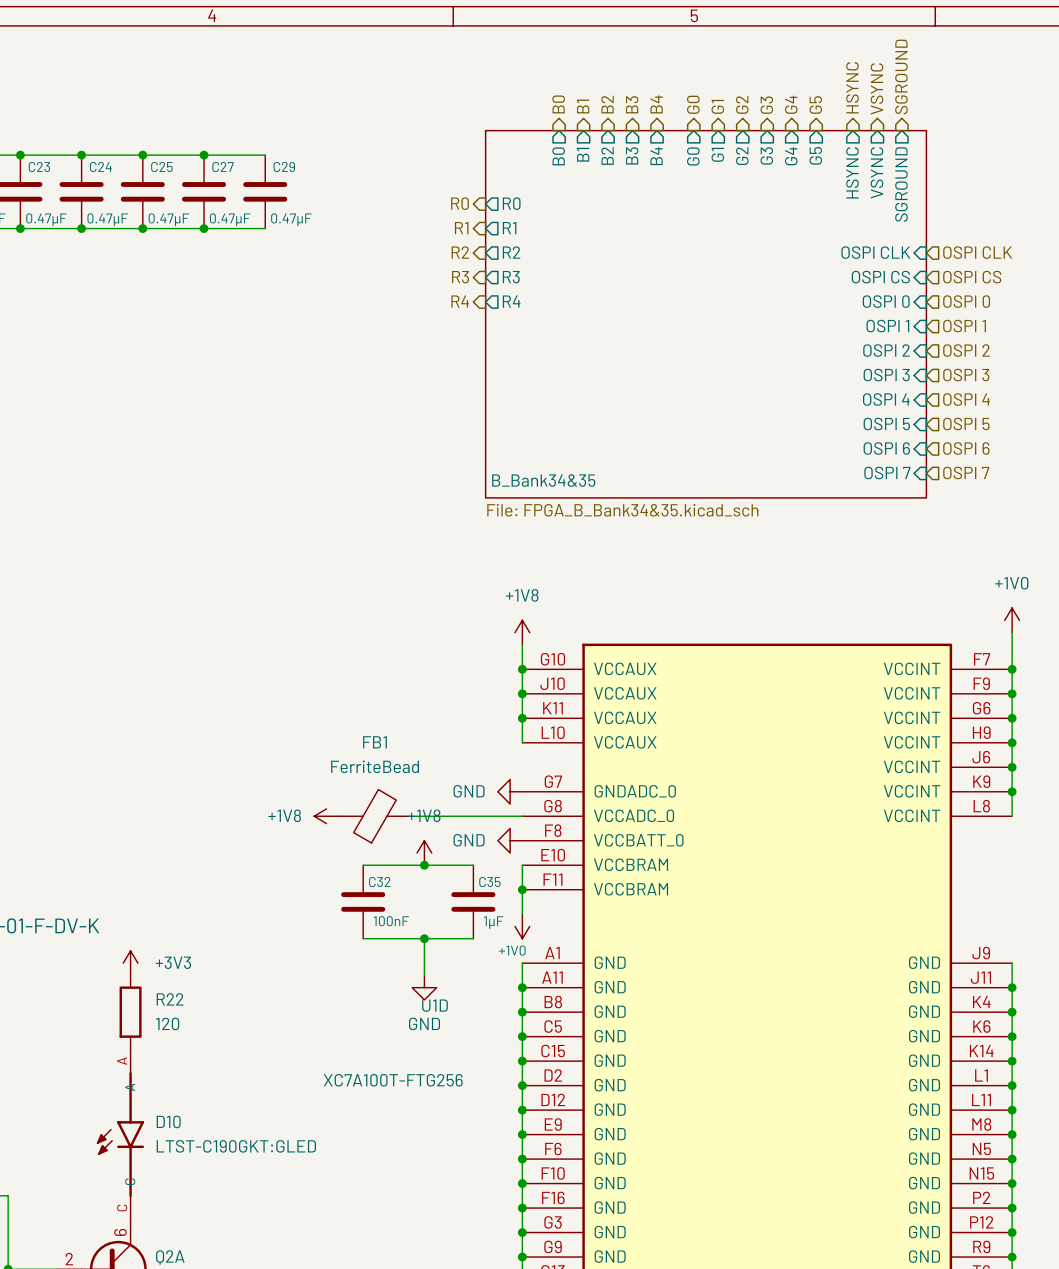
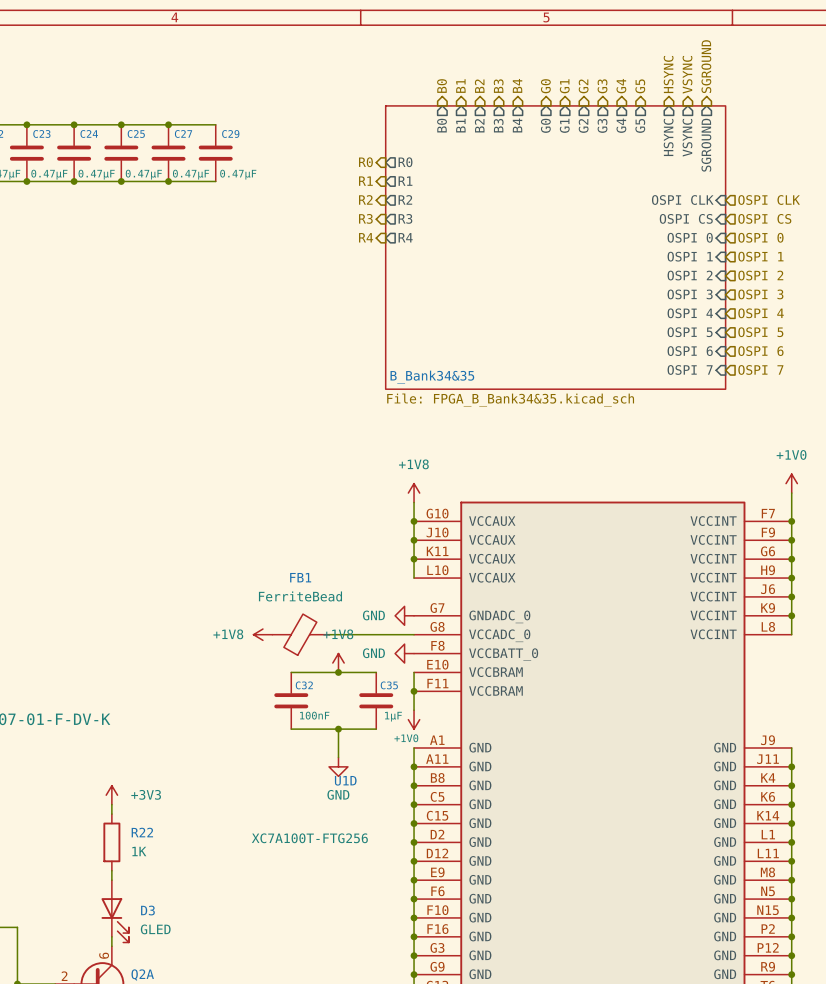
power symbol position: +3V3 (130, 963) -> +3V3 (111, 795)
R22 position: (130, 1012) -> (111, 842)
R22 value: 120 (167, 1023) -> 1K (139, 851)
wire: none -> (111, 870) (111, 880)
D10: LTST-C190GKT:GLED (120, 1134) -> none
D3: none -> GLED (115, 911)

